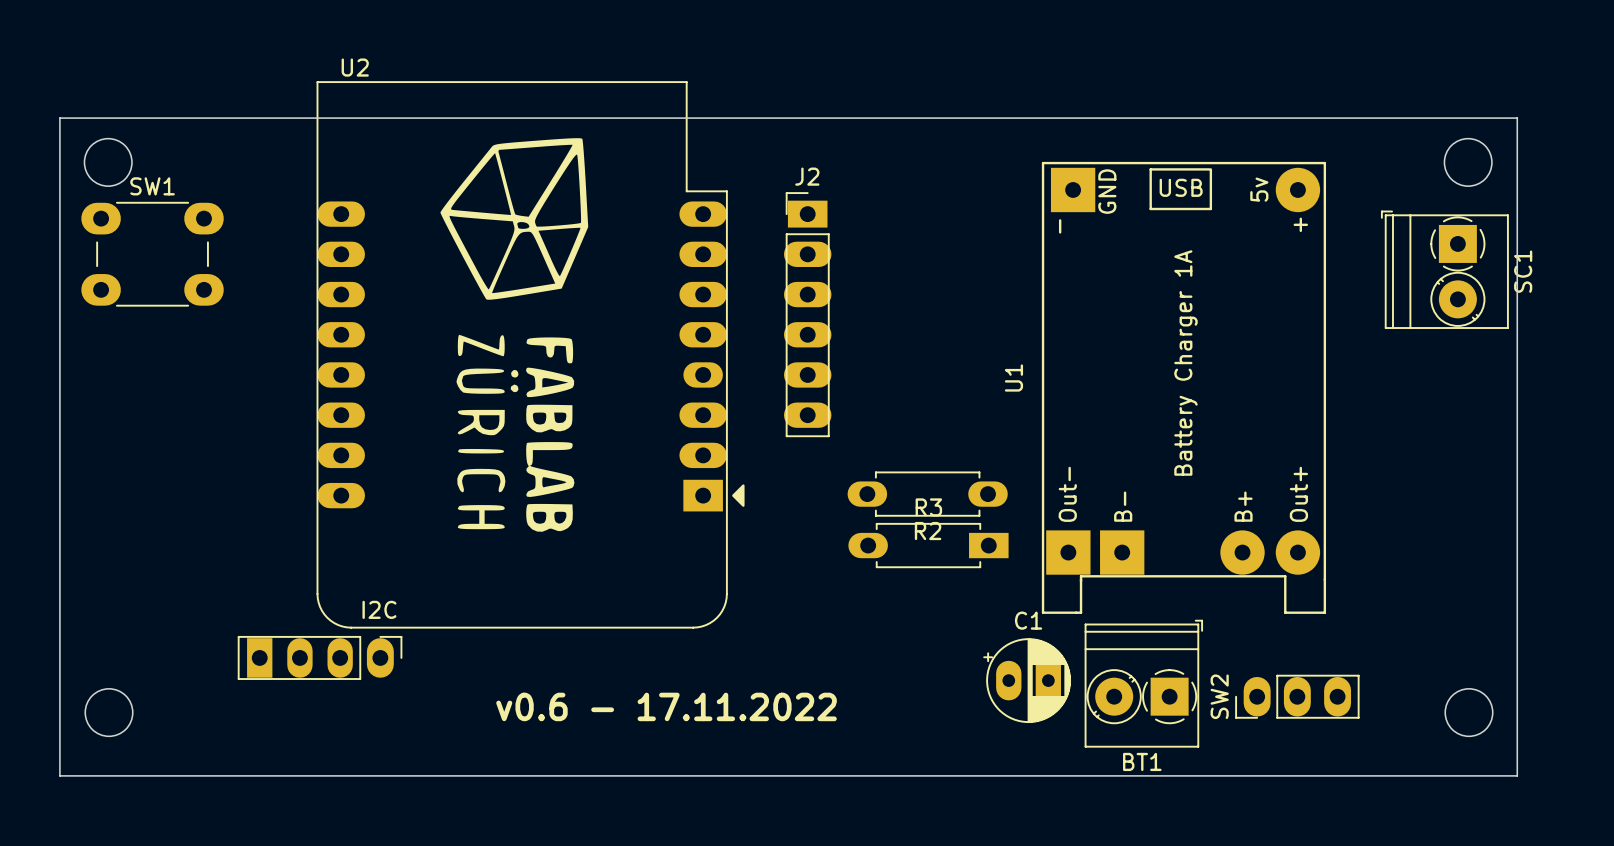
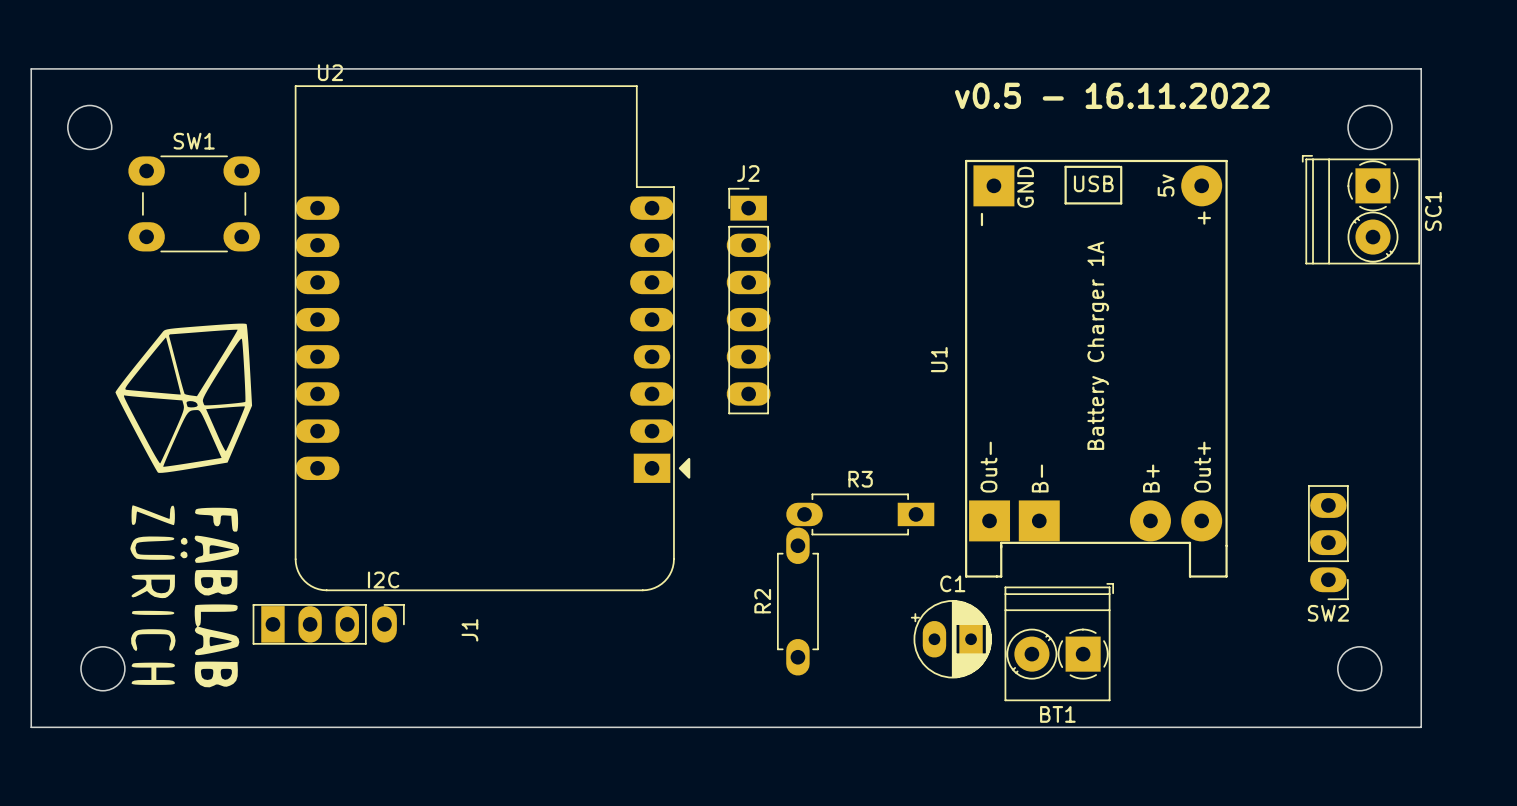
text: none -> v0.5 - 16.11.2022 (1112, 95)
round board edge position: (108, 162) -> (89, 127)
round board edge position: (1468, 162) -> (1370, 127)
SW1 position: (152, 254) -> (194, 203)
SC1 position: (1444, 269) -> (1361, 209)
drawing position: (514, 334) -> (183, 505)
R2 rotation: 0° (927, 494) -> 90° clockwise (797, 601)
R2 position: (927, 494) -> (797, 601)
part: I2C (320, 657) -> none
J1: none -> I2C (328, 624)
SW2 rotation: 0° (1297, 696) -> 90° counterclockwise (1328, 542)
SW2 position: (1297, 696) -> (1328, 542)
text: v0.6 - 17.11.2022 (666, 706) -> none
board edge: (59, 775) (59, 118) (1517, 118) (1517, 775) -> (57, 727) (31, 727) (31, 68) (1421, 68) (1421, 727) (1404, 727)

